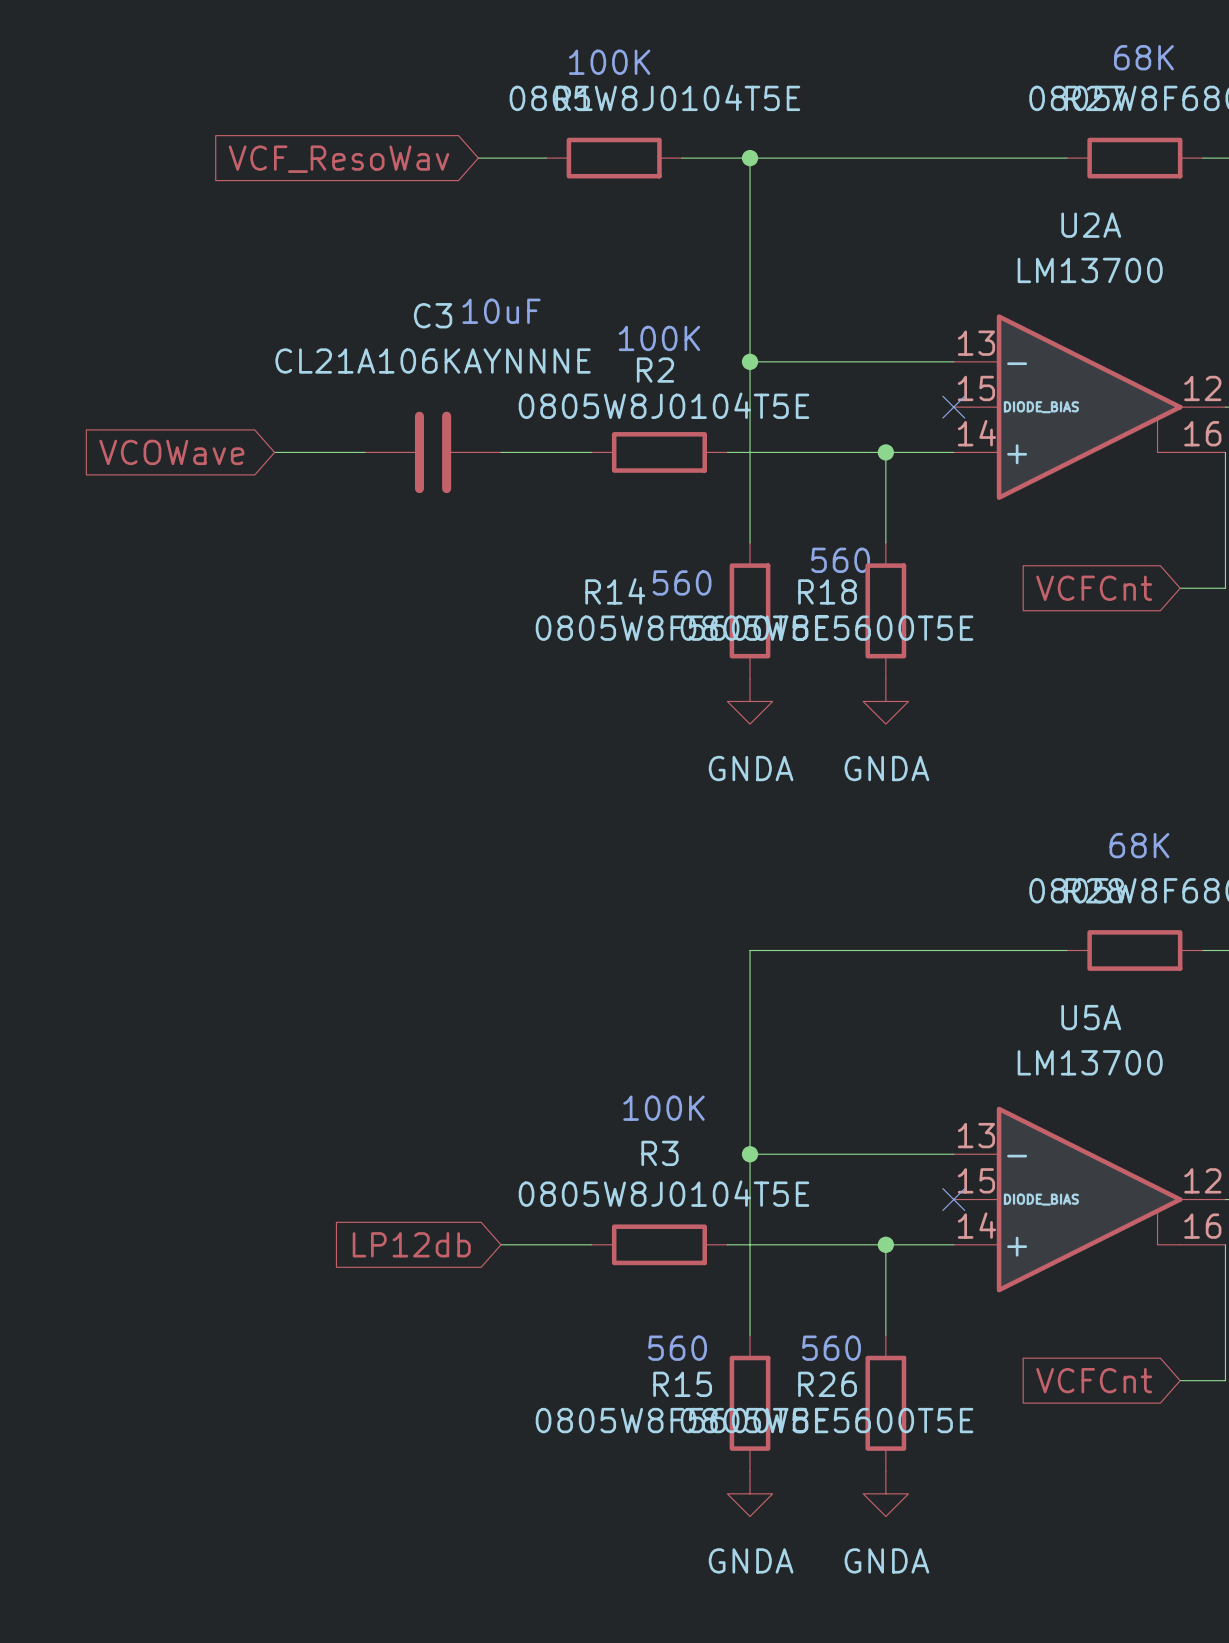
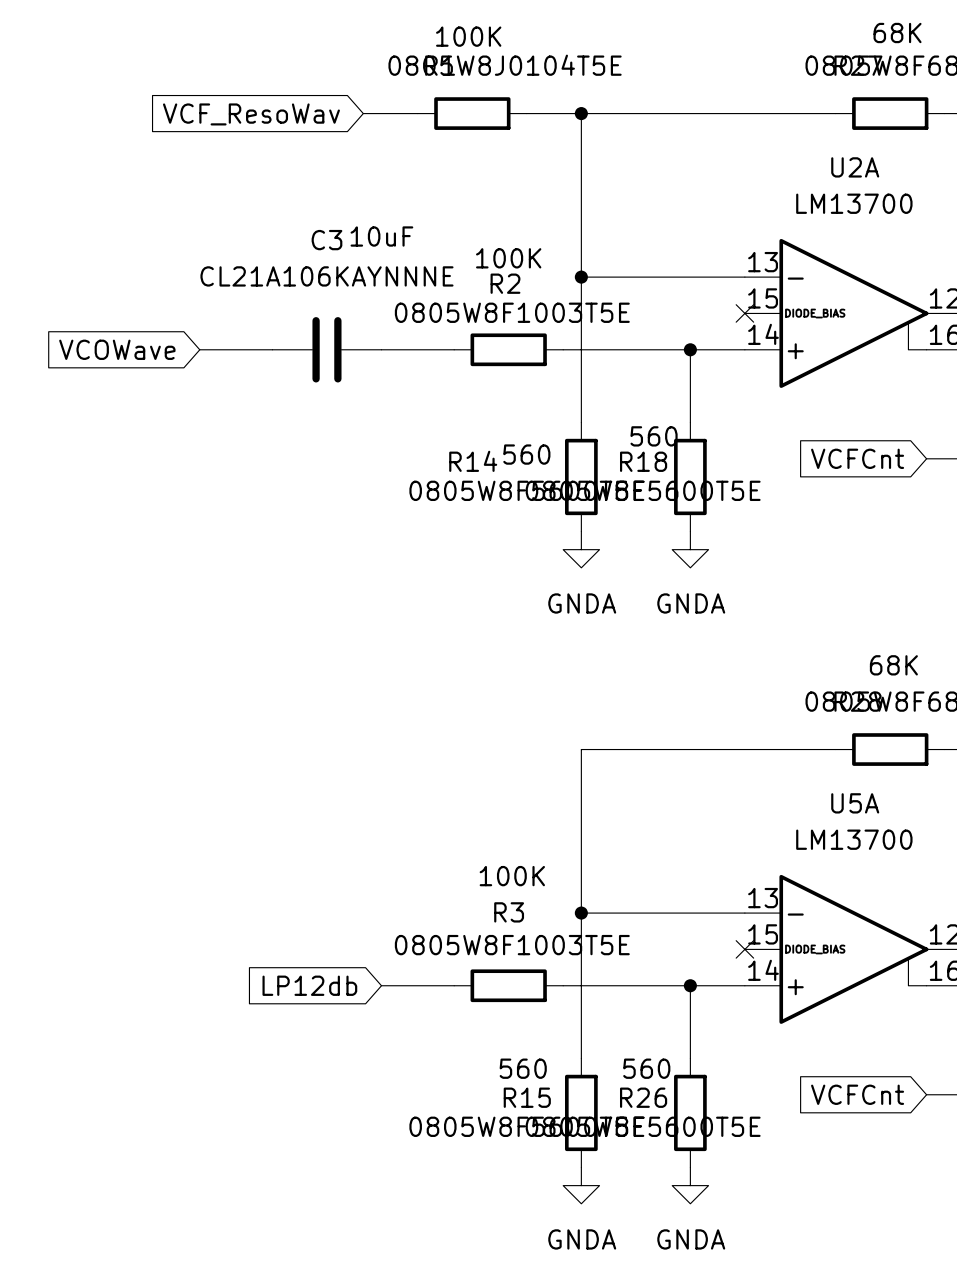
R2 value: 0805W8J0104T5E (663, 405) -> 0805W8F1003T5E (512, 312)
R3 value: 0805W8J0104T5E (663, 1193) -> 0805W8F1003T5E (512, 945)

